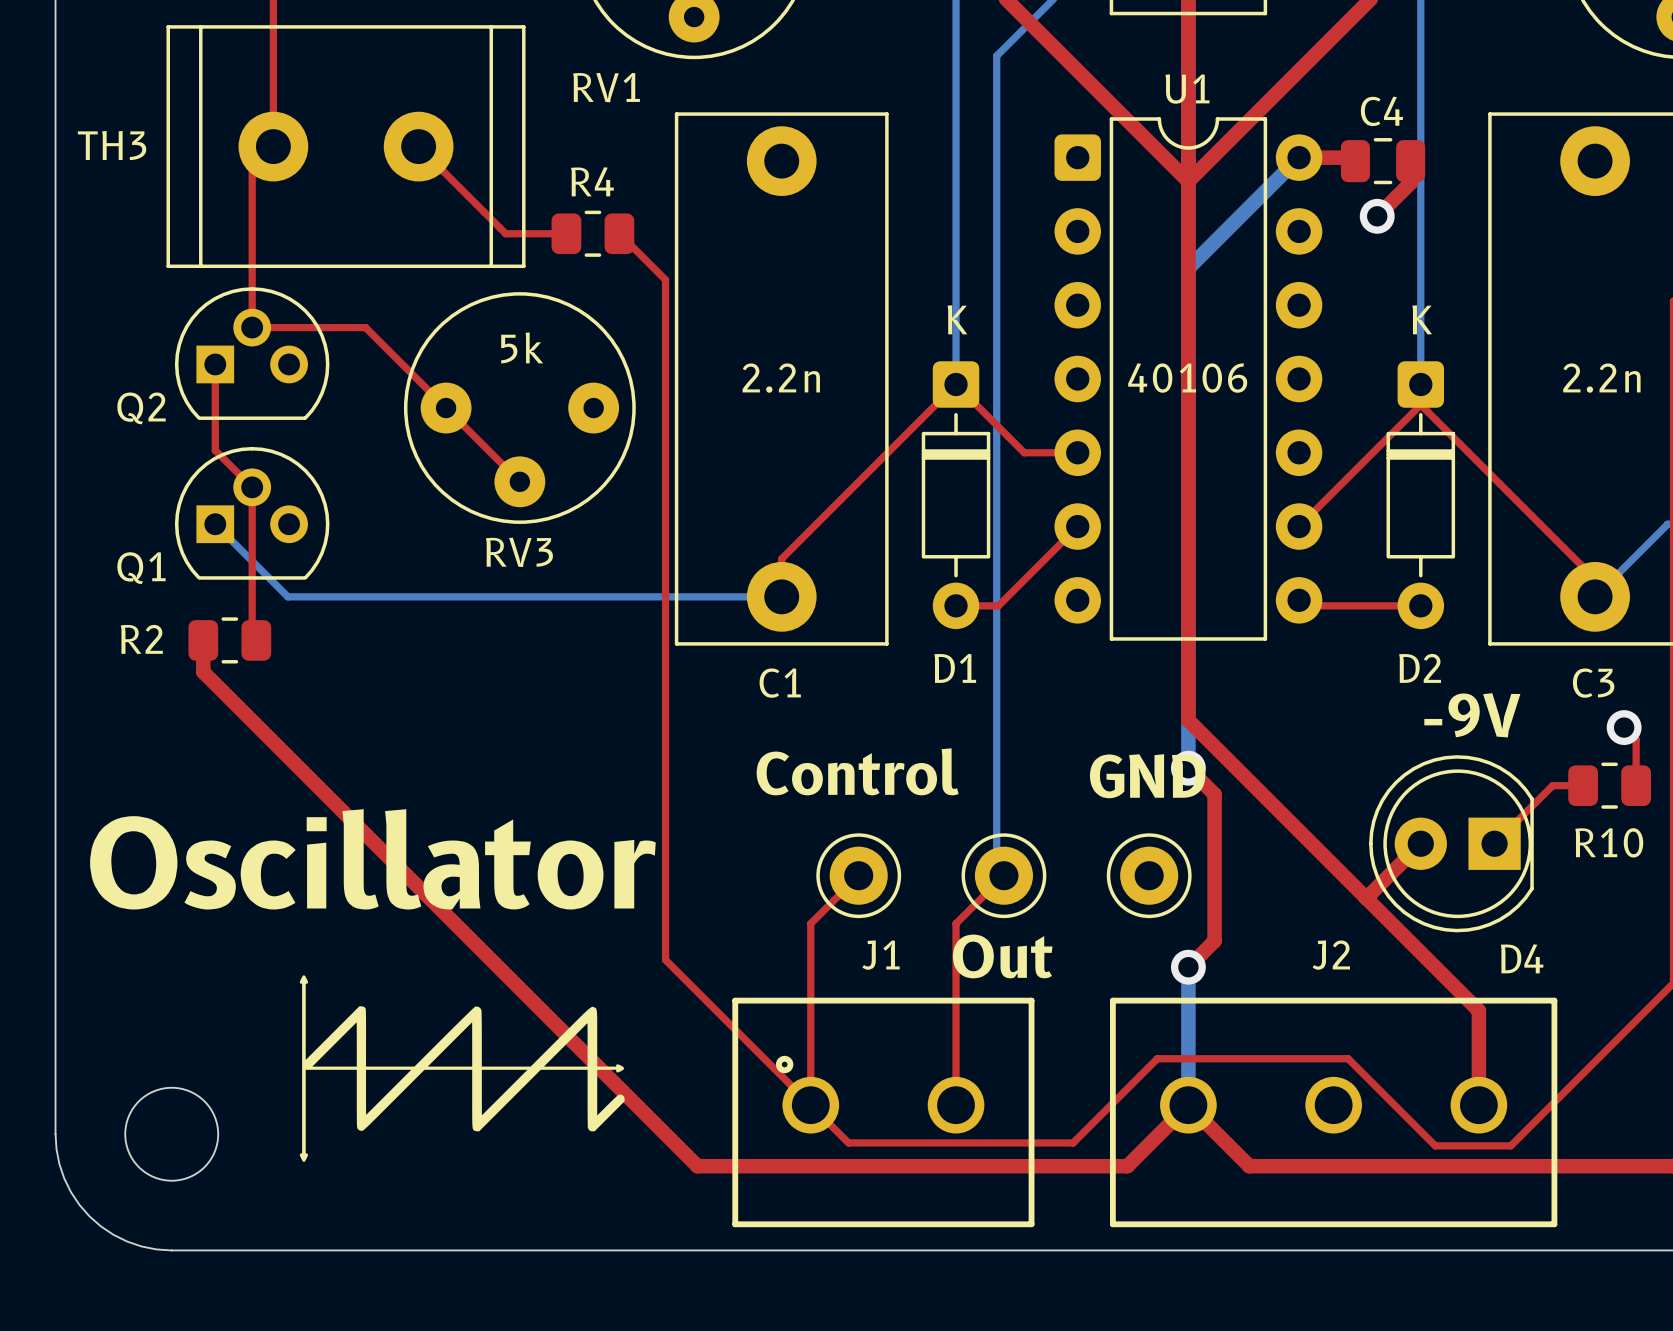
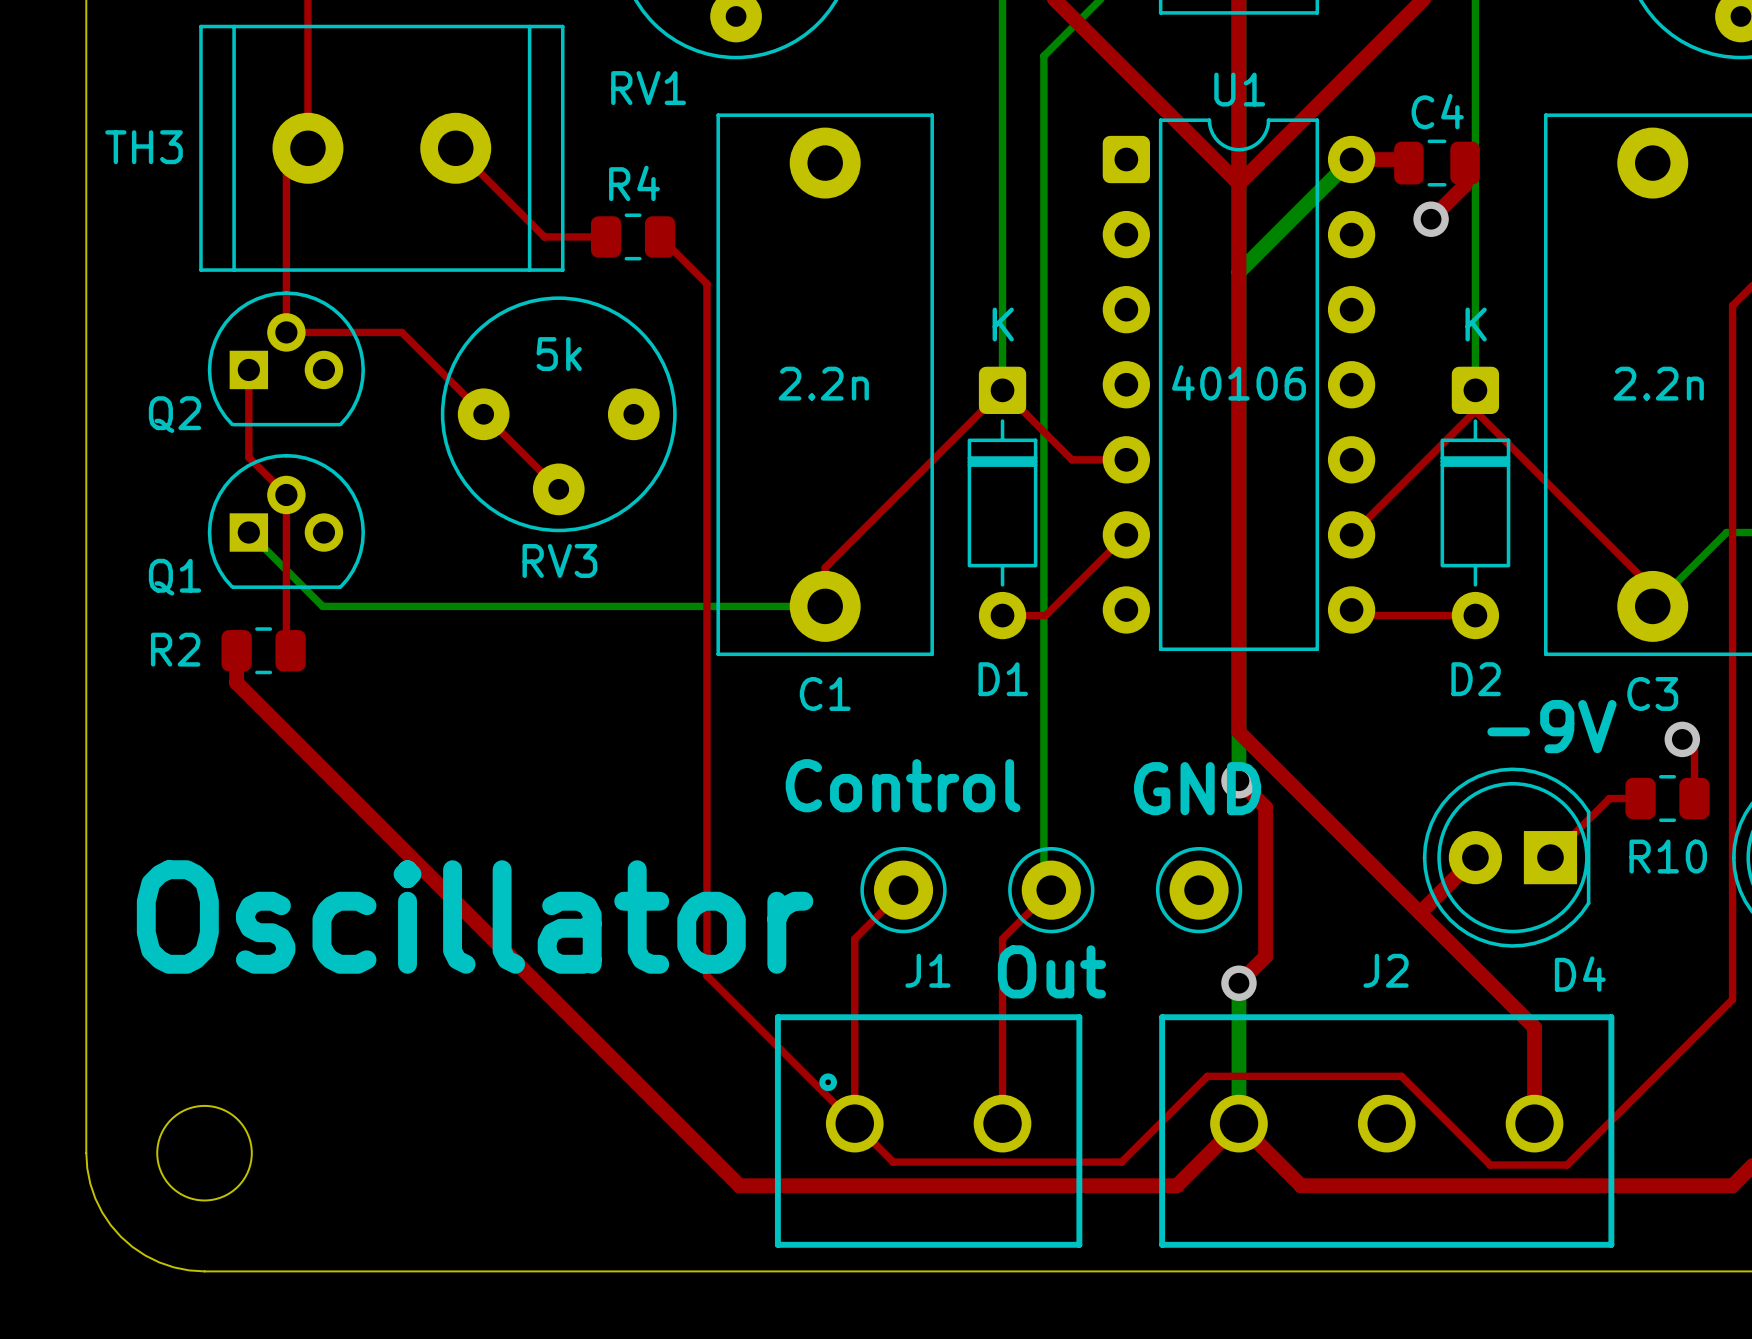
text position: Oscillator (372, 859) -> Oscillator (475, 916)
drawing: [299, 975, 625, 1162] -> none

